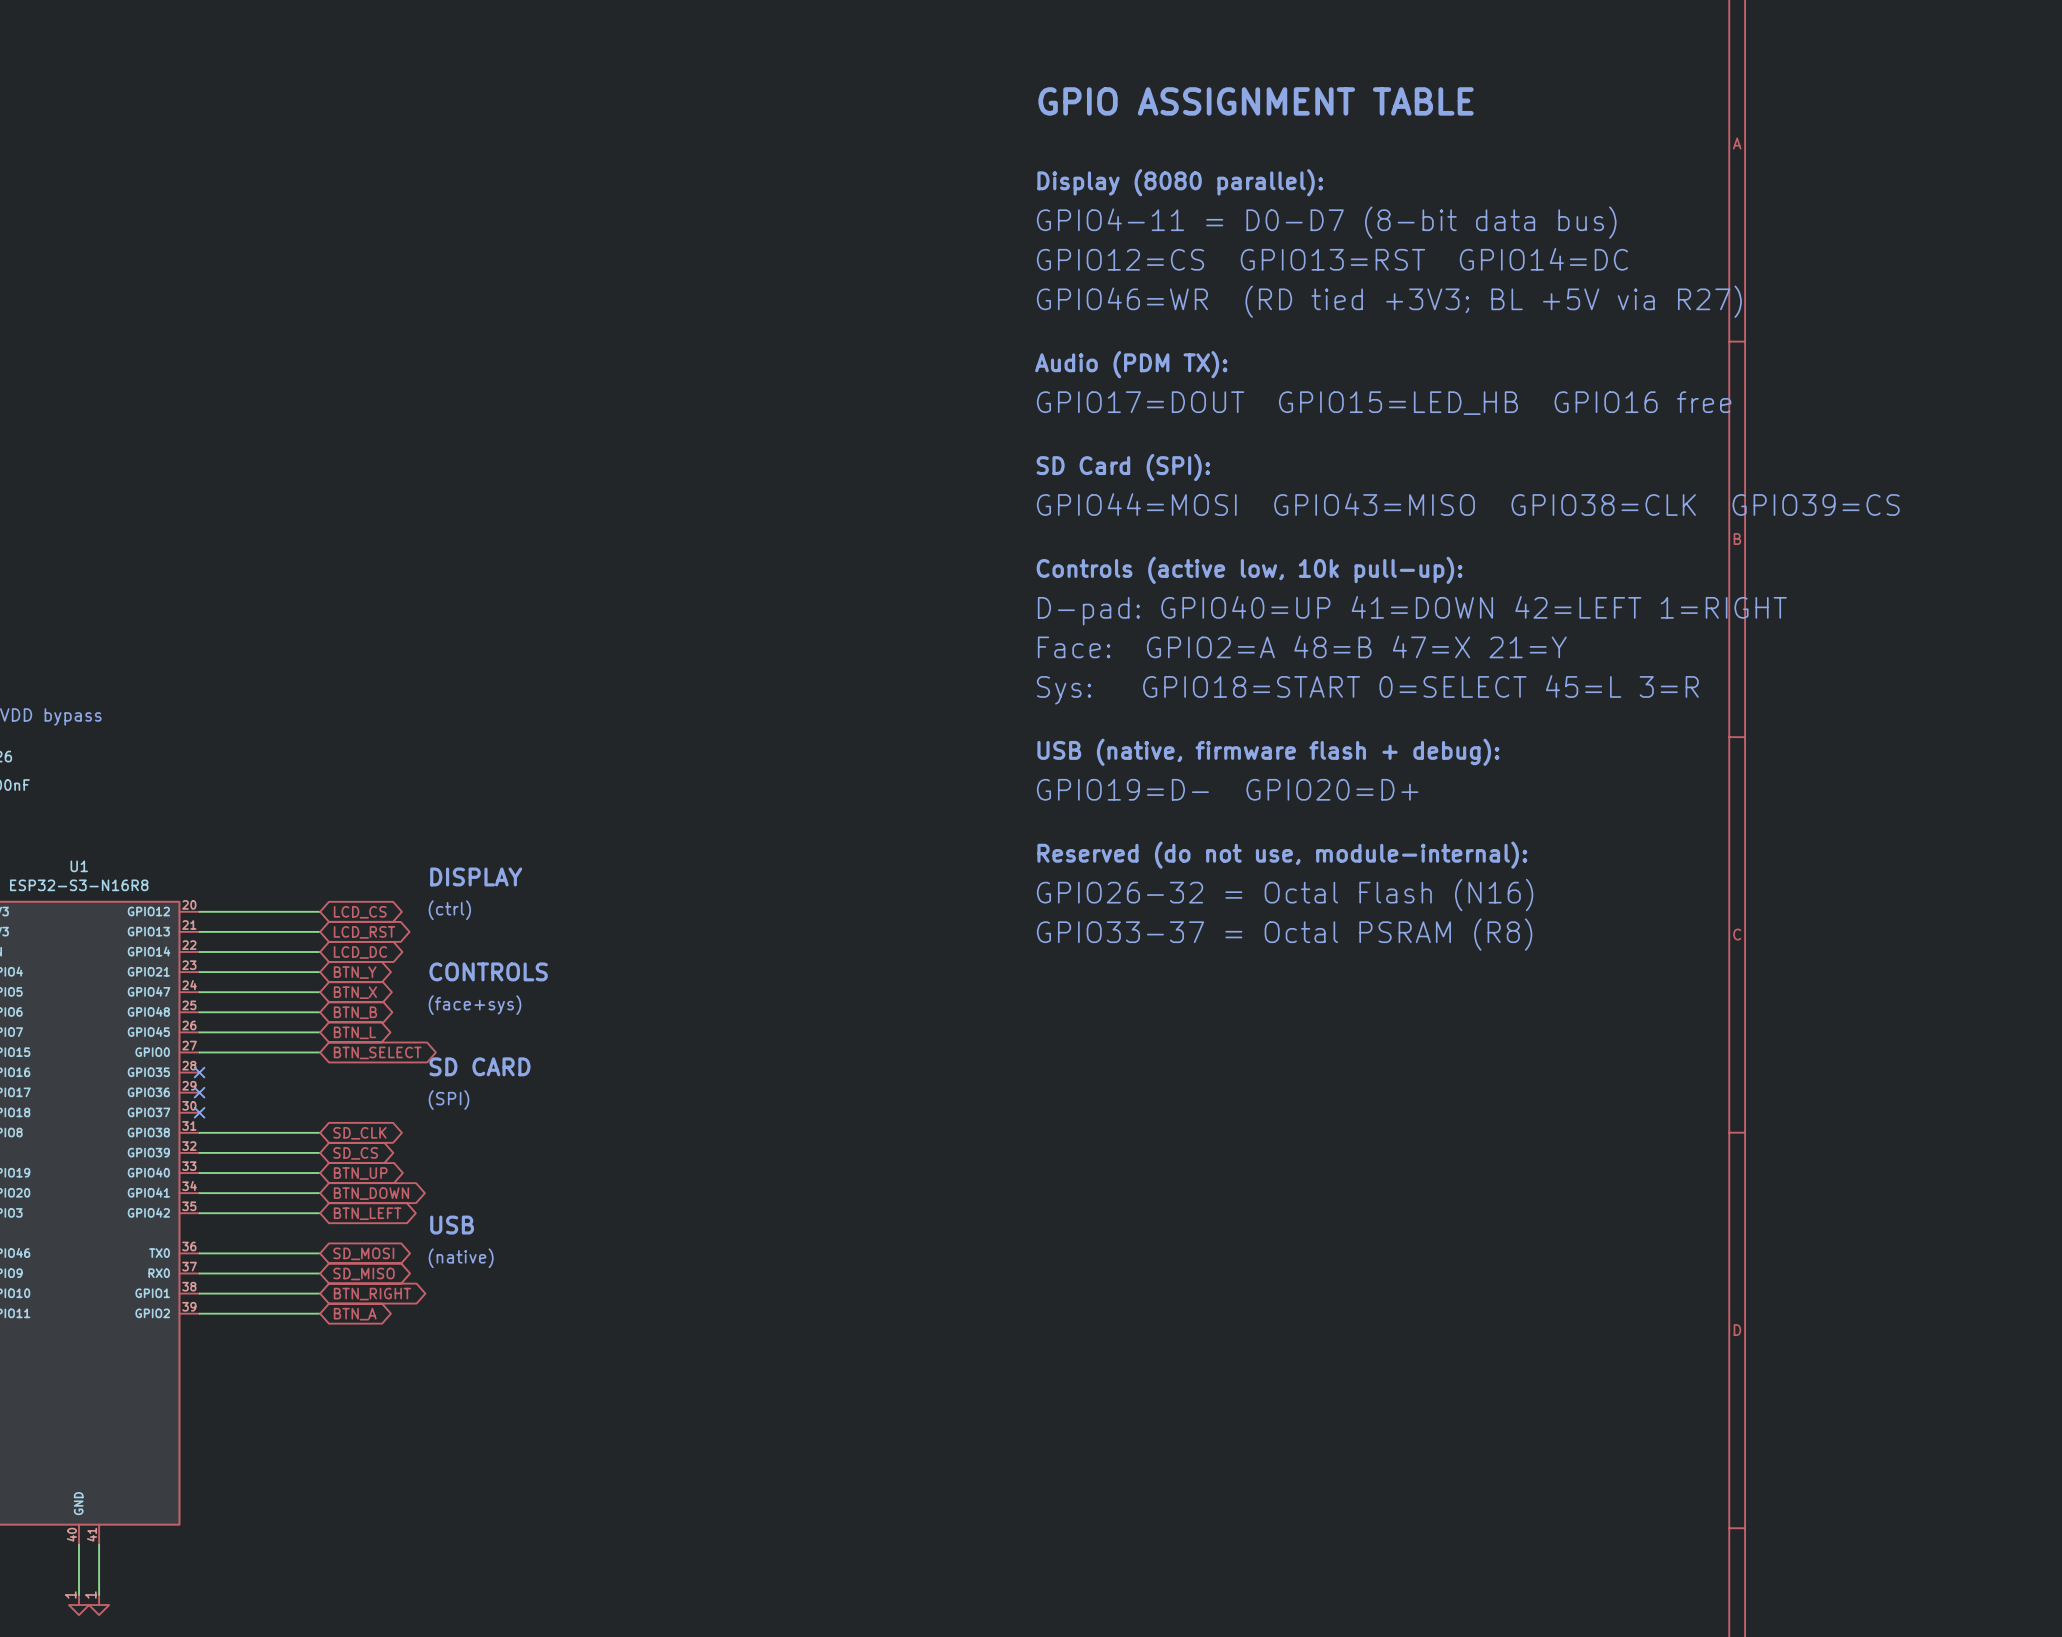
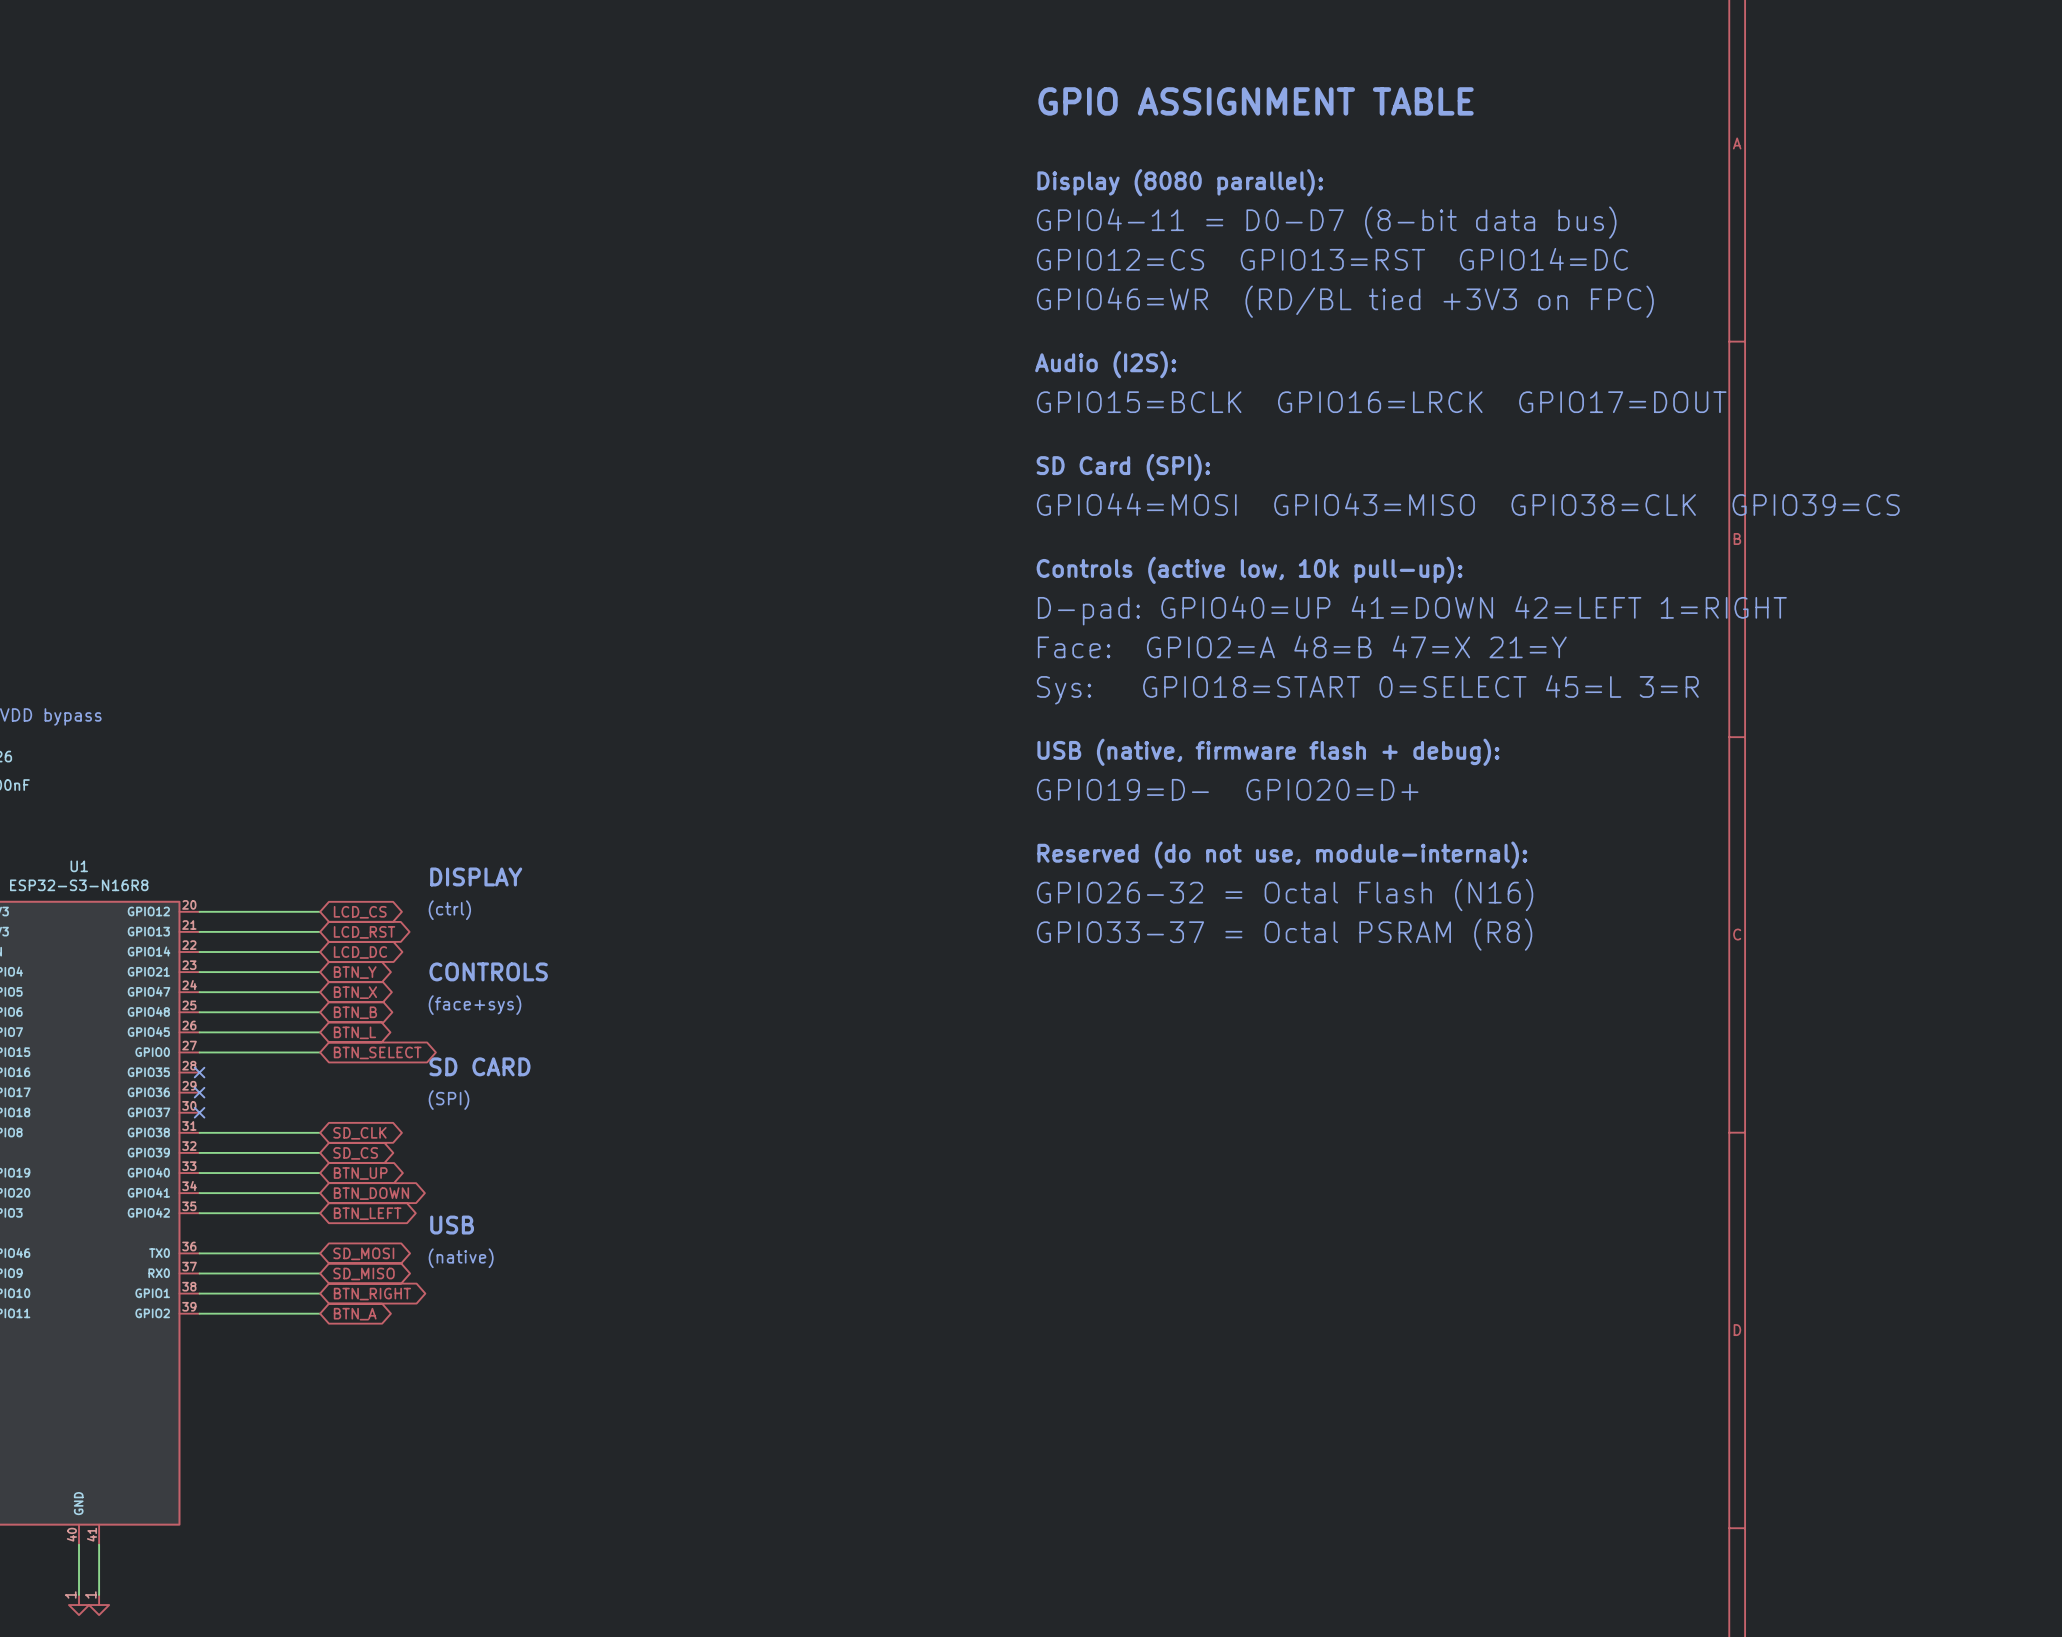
text: GPIO46=WR (RD tied +3V3; BL +5V via R27) (1389, 301) -> GPIO46=WR (RD/BL tied +3V3 on FPC) (1345, 301)
text: Audio (PDM TX): (1131, 364) -> Audio (I2S): (1105, 364)
text: GPIO17=DOUT GPIO15=LED_HB GPIO16 free (1384, 403) -> GPIO15=BCLK GPIO16=LRCK GPIO17=DOUT (1381, 402)

